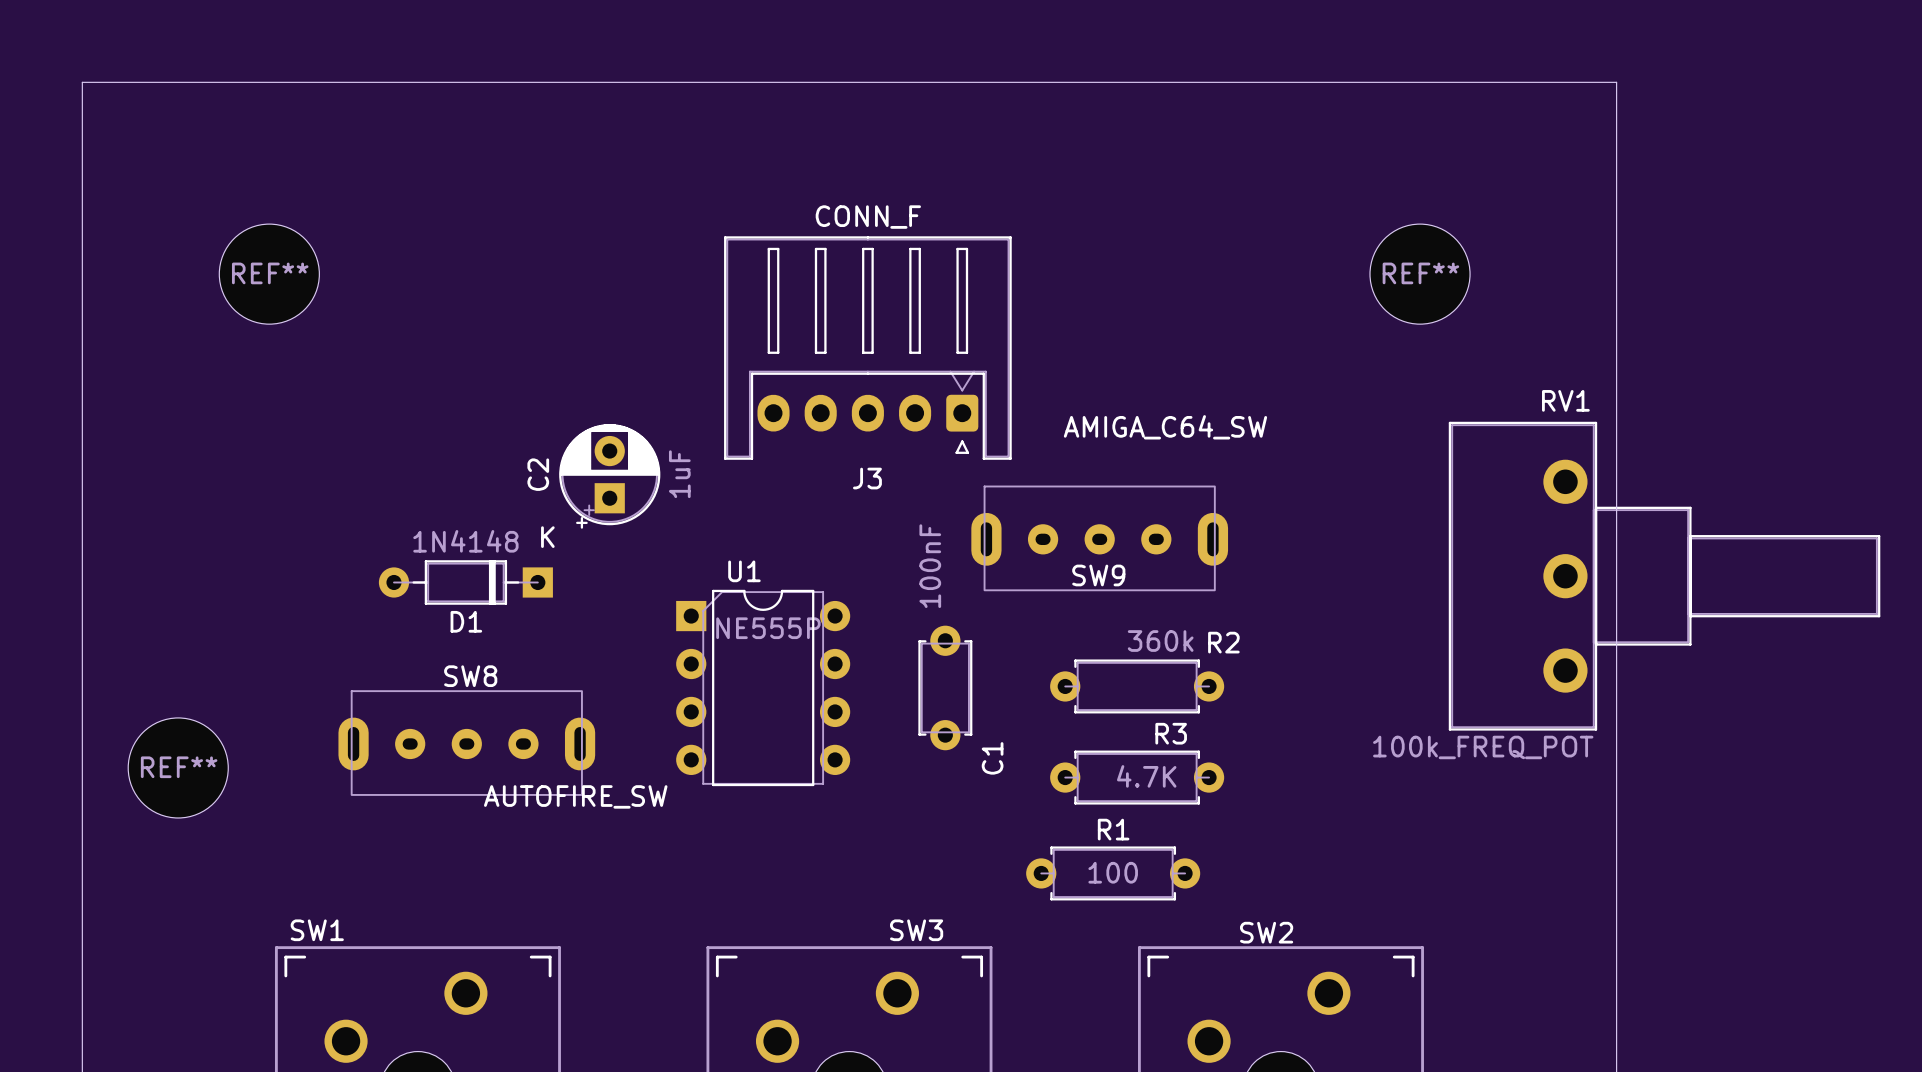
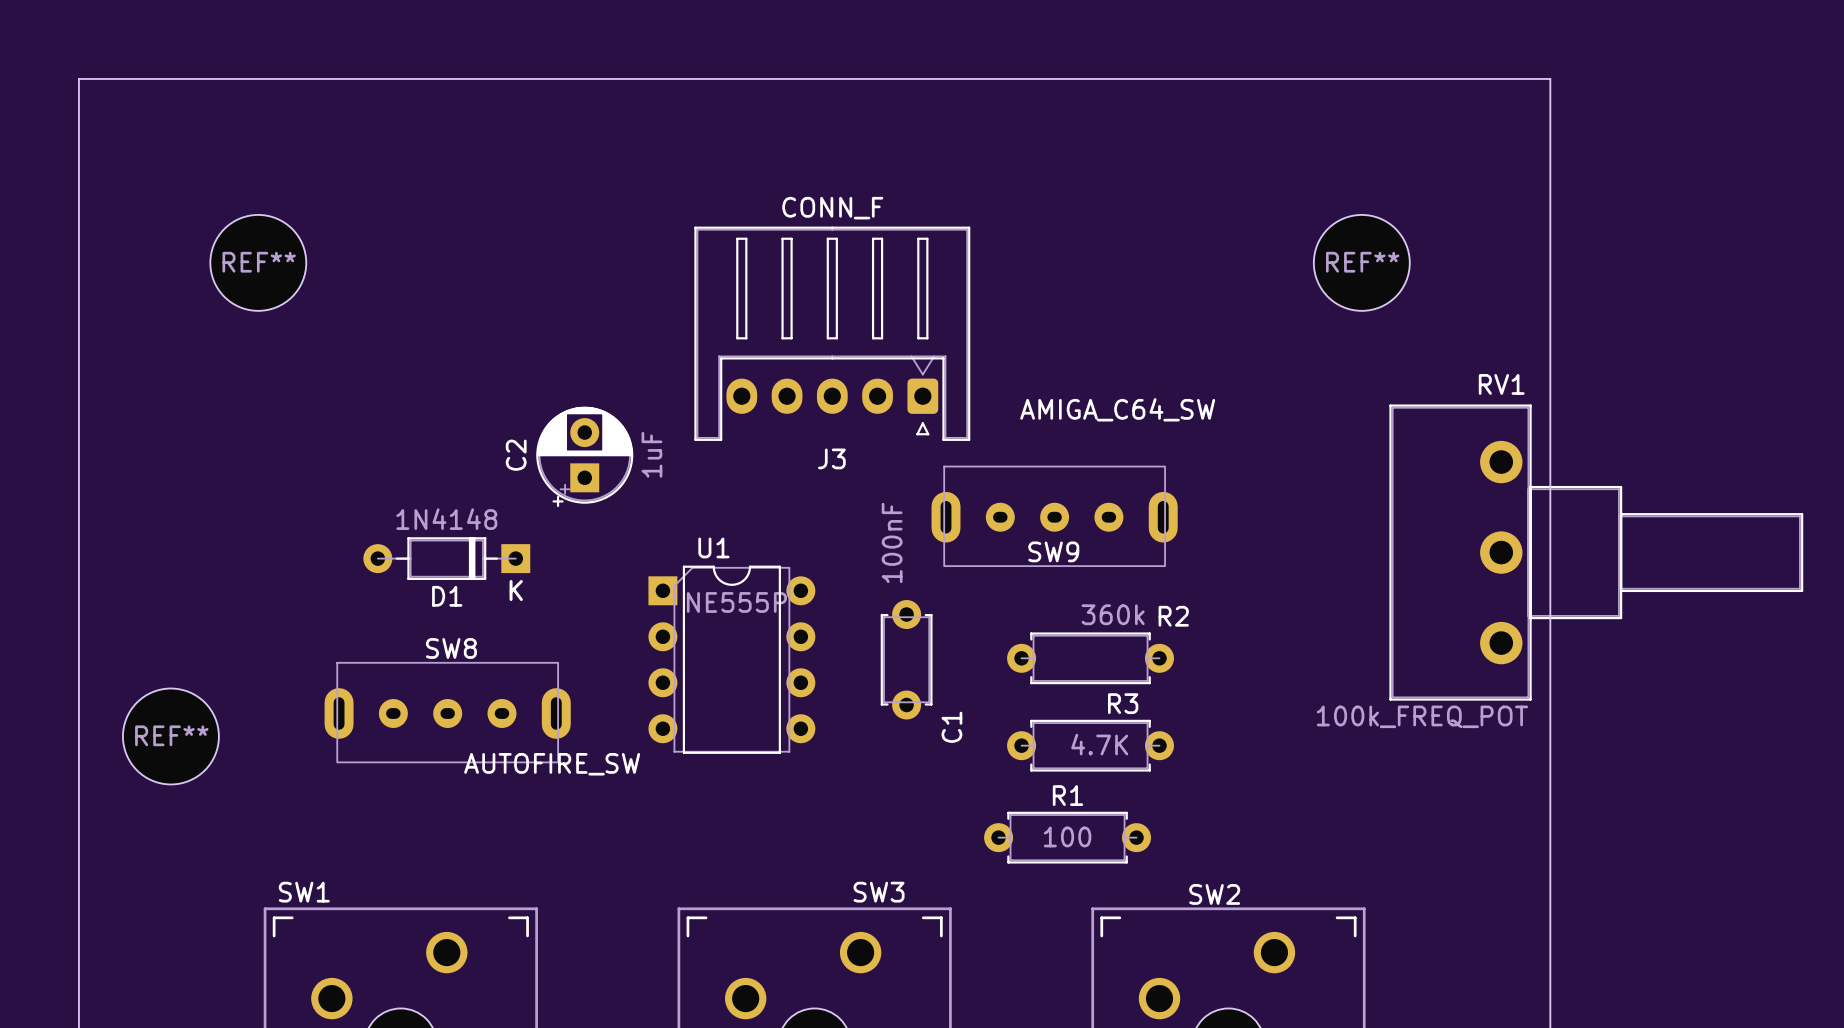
D1 footprint: [378, 560, 553, 605] -> [363, 537, 531, 580]

